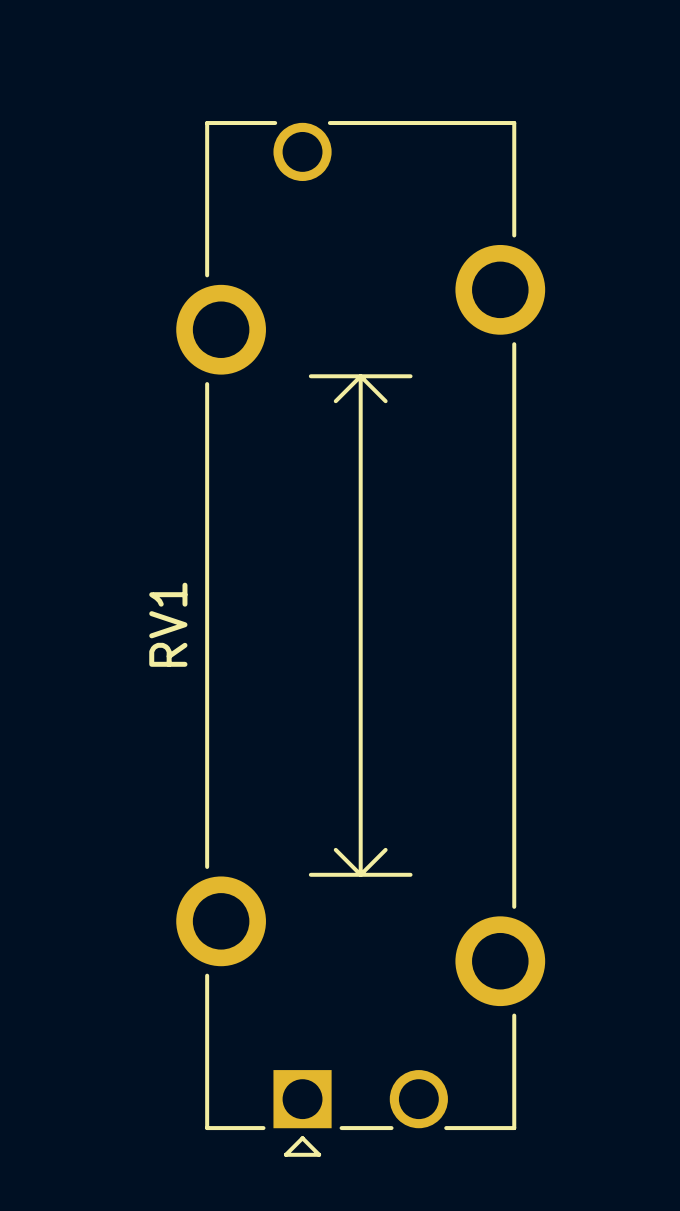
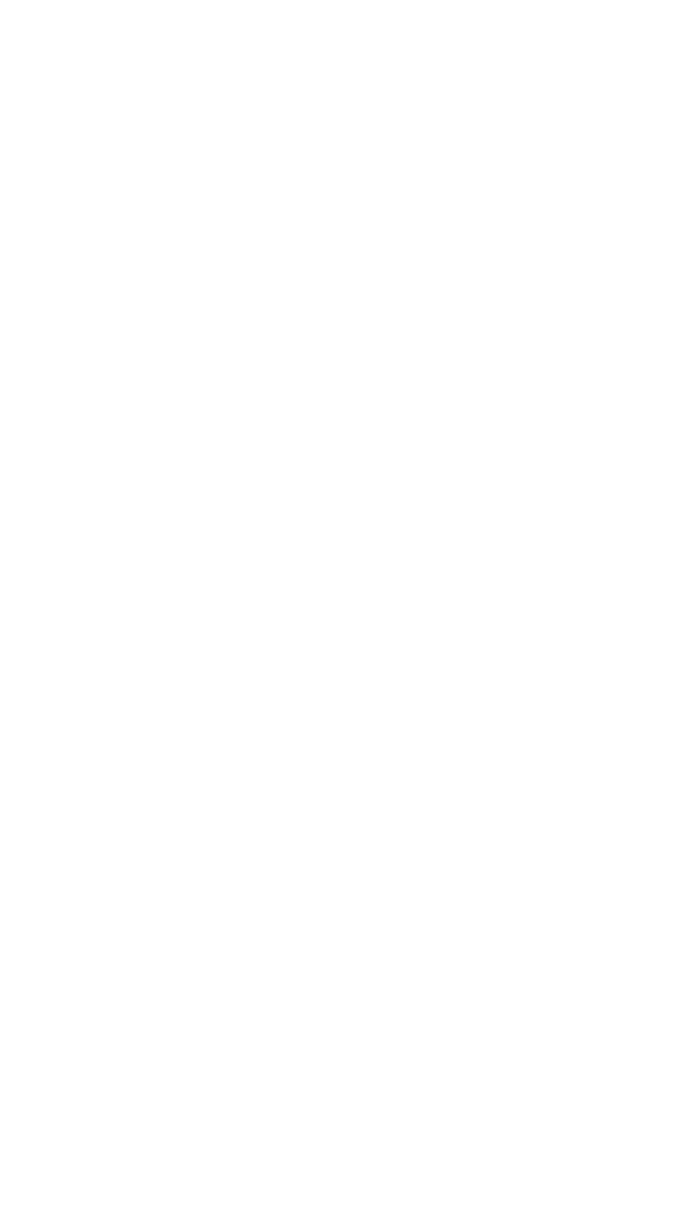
RV1: (360, 638) -> none

